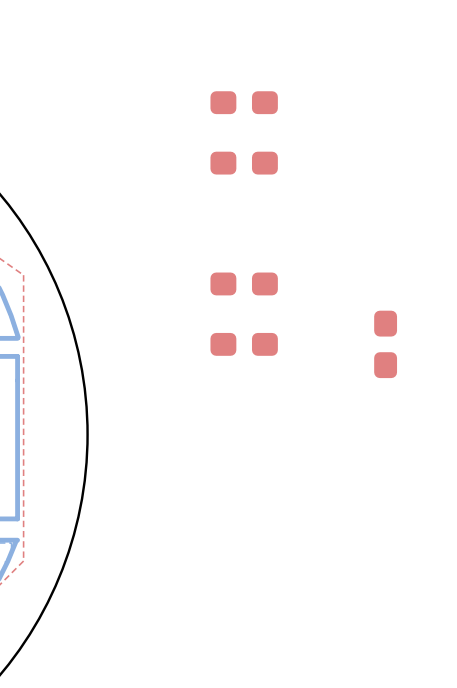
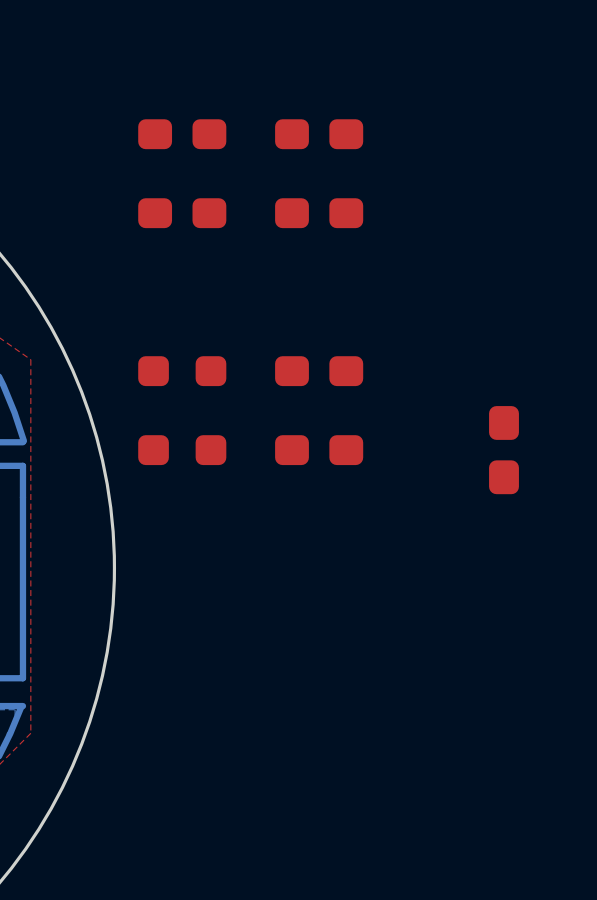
part: none -> (182, 134)
part: none -> (182, 213)
part: none -> (182, 371)
part: none -> (182, 450)

